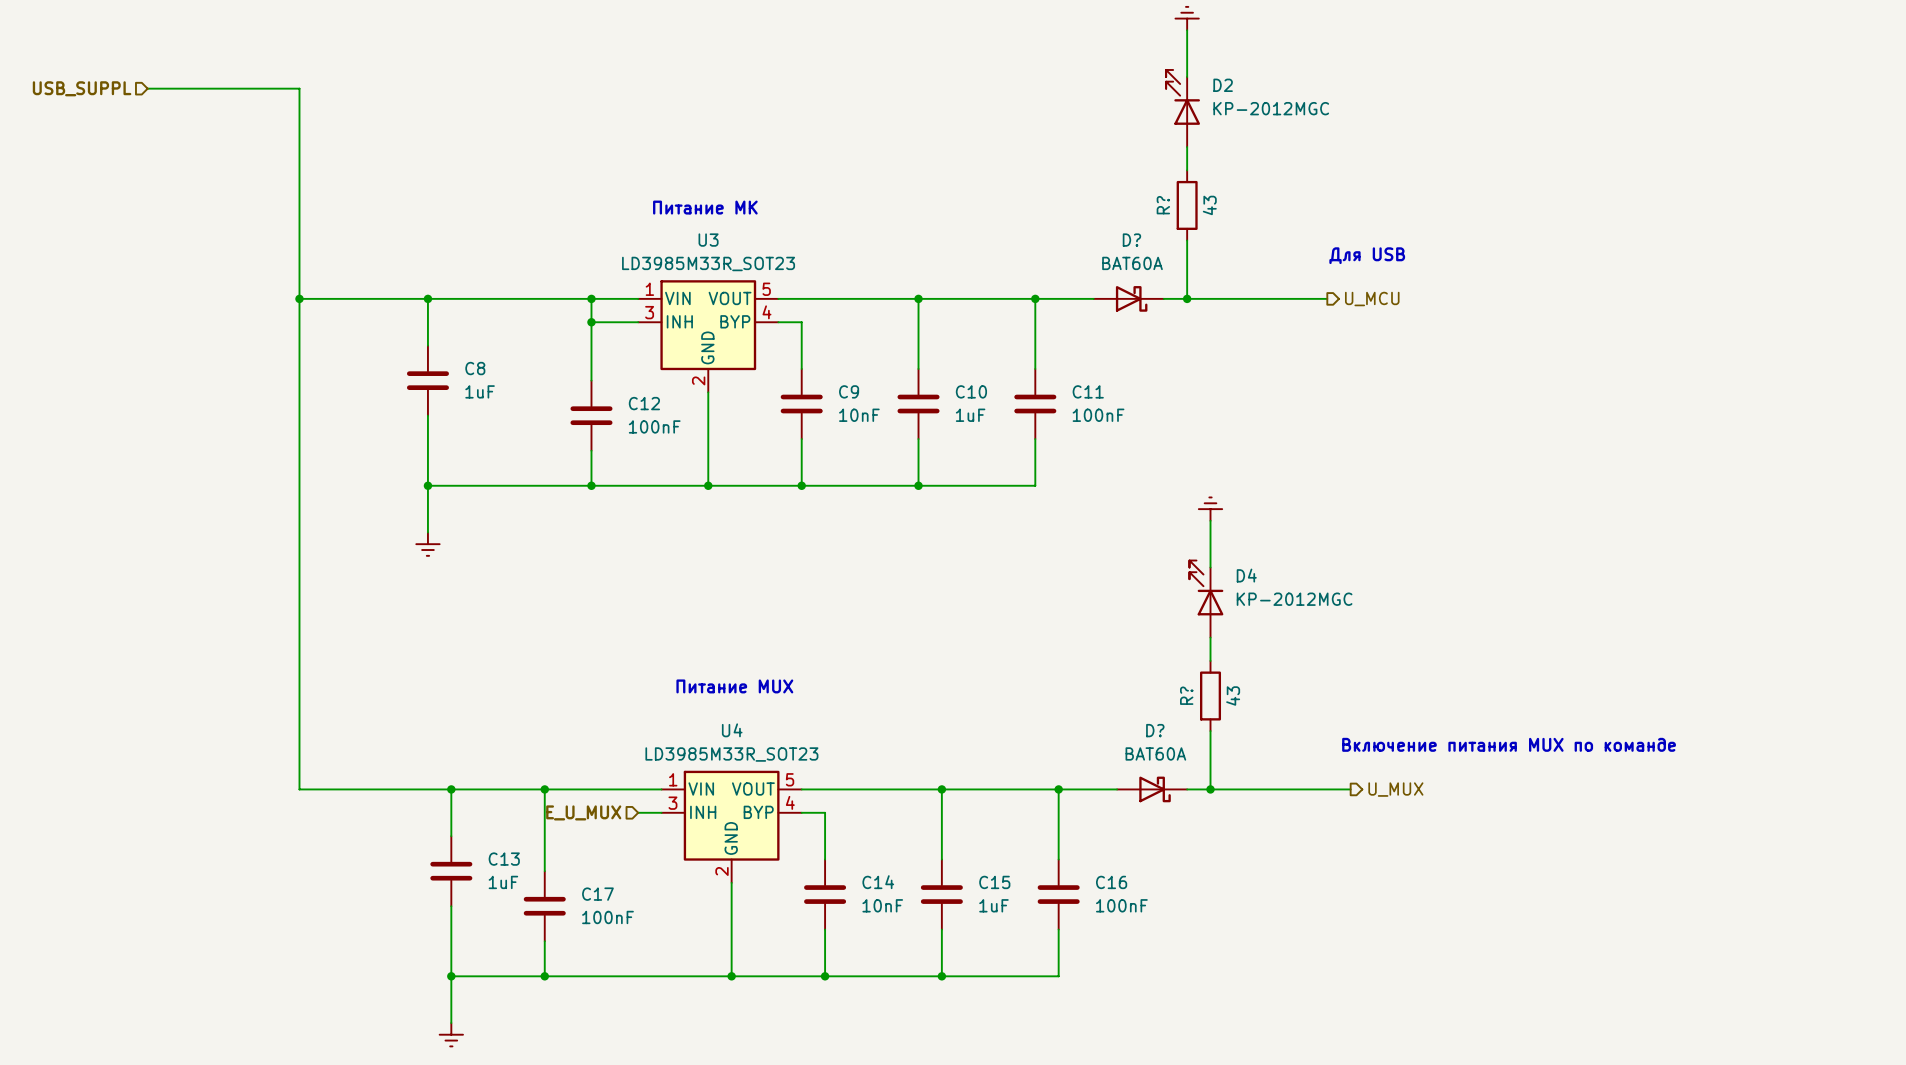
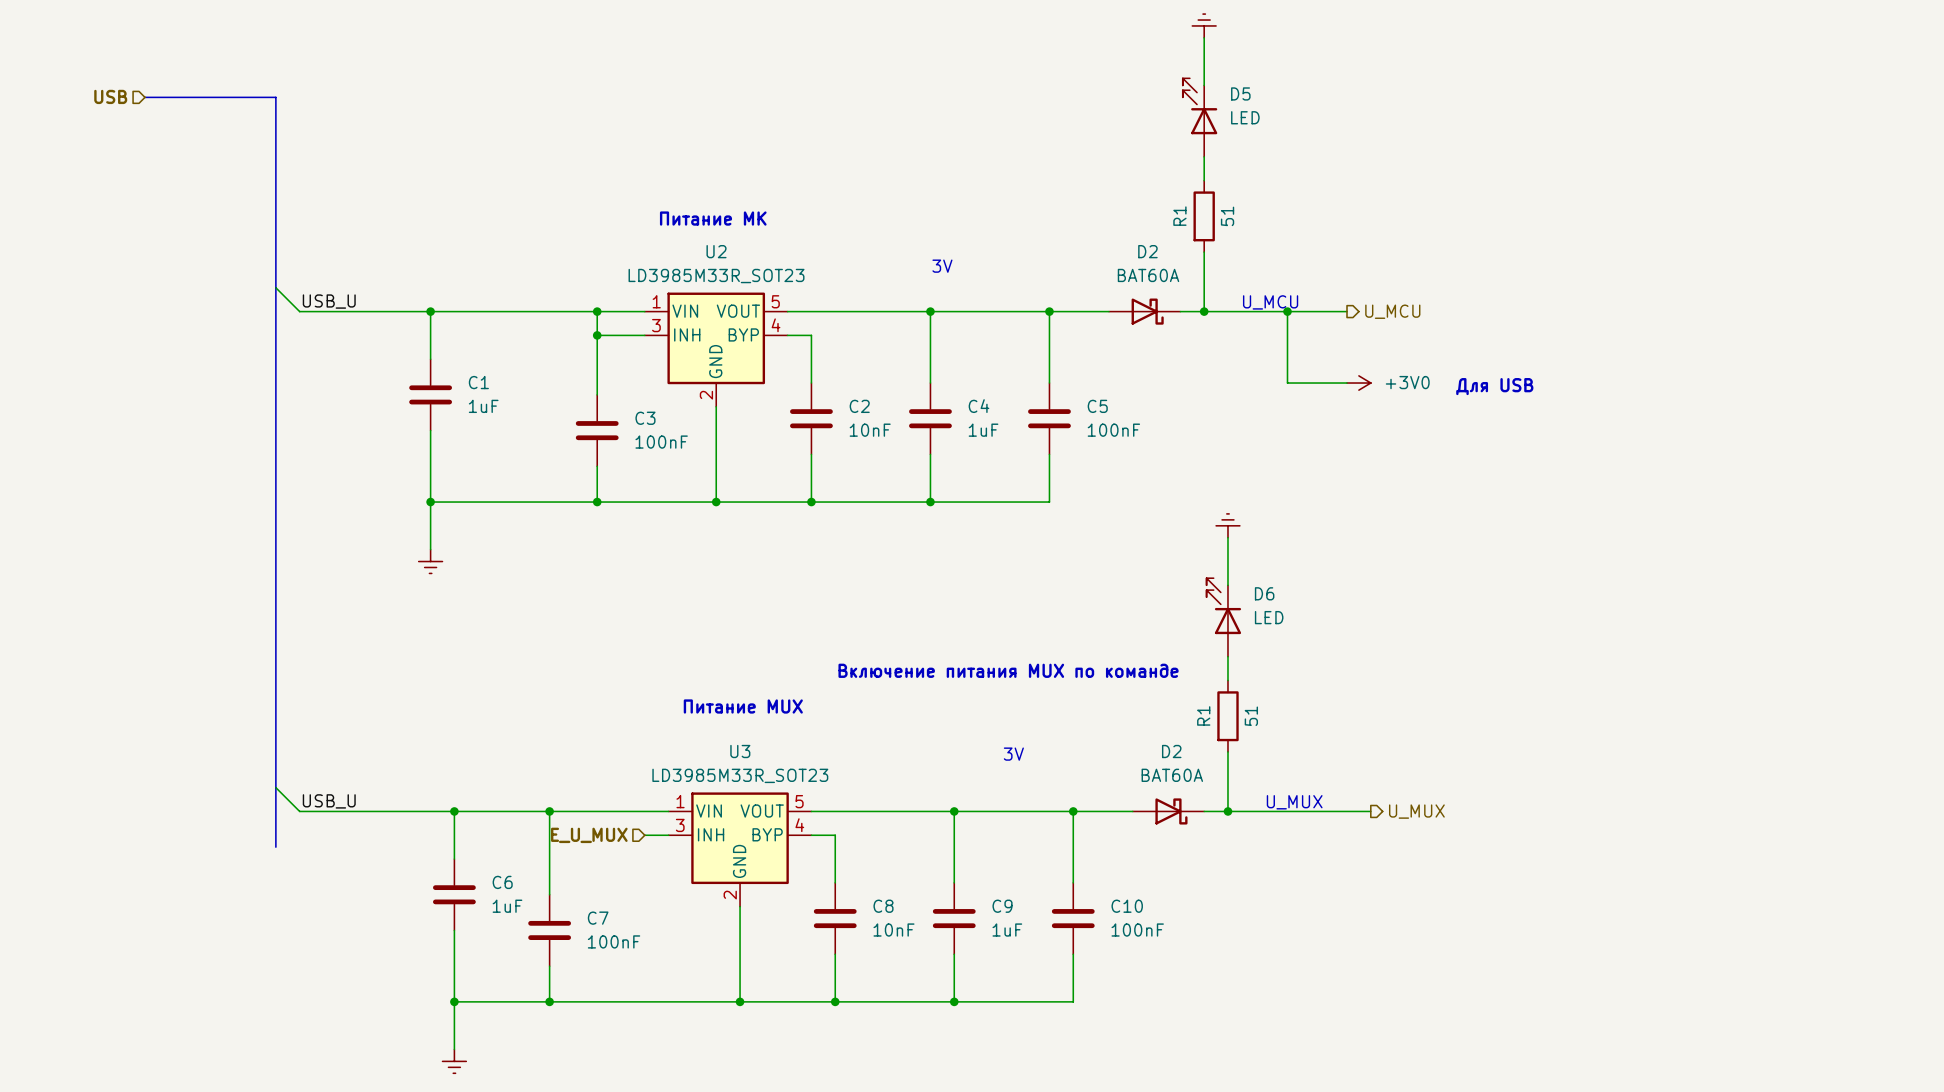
D2 name: D2 (1223, 85) -> D5 (1240, 93)
hierarchical label: USB_SUPPL (82, 88) -> USB (110, 96)
wire: (147, 88) (299, 88) (299, 789) -> (275, 787) (299, 811)
bus: none -> (144, 97) (275, 97) (275, 847)
D2 value: KP-2012MGC (1271, 108) -> LED (1245, 117)
R? name: R? (1163, 205) -> R1 (1179, 216)
R? value: 43 (1209, 205) -> 51 (1227, 216)
U3 name: U3 (708, 240) -> U2 (716, 251)
D? name: D? (1131, 240) -> D2 (1147, 251)
text: none -> 3V (942, 266)
text position: Для USB (1367, 255) -> Для USB (1494, 386)
wire: none -> (275, 287) (299, 311)
label: none -> USB_U (329, 301)
text: none -> U_MCU (1270, 302)
junction: (299, 298) -> none
wire: none -> (1287, 311) (1287, 383) (1347, 383)
junction: none -> (1287, 311)
C8 name: C8 (475, 368) -> C1 (478, 382)
power symbol: none -> +3V0 (1358, 383)
C9 name: C9 (849, 391) -> C2 (859, 406)
C10 name: C10 (971, 391) -> C4 (979, 406)
C11 name: C11 (1088, 391) -> C5 (1097, 406)
C12 name: C12 (644, 403) -> C3 (645, 418)
D4 name: D4 (1246, 575) -> D6 (1264, 593)
D4 value: KP-2012MGC (1294, 599) -> LED (1269, 617)
text: none -> Включение питания MUX по команде (1008, 670)
R? name: R? (1186, 695) -> R1 (1203, 715)
R? value: 43 (1233, 696) -> 51 (1251, 716)
U4 name: U4 (732, 730) -> U3 (740, 751)
D? name: D? (1155, 730) -> D2 (1171, 751)
text: none -> 3V (1013, 754)
text: Включение питания MUX по команде (1509, 744) -> none
label: none -> USB_U (329, 801)
text: none -> U_MUX (1294, 802)
C13 name: C13 (504, 859) -> C6 (502, 882)
C14 name: C14 (878, 882) -> C8 (883, 906)
C15 name: C15 (994, 882) -> C9 (1002, 906)
C16 name: C16 (1111, 882) -> C10 (1127, 906)
C17 name: C17 (597, 894) -> C7 (598, 918)

